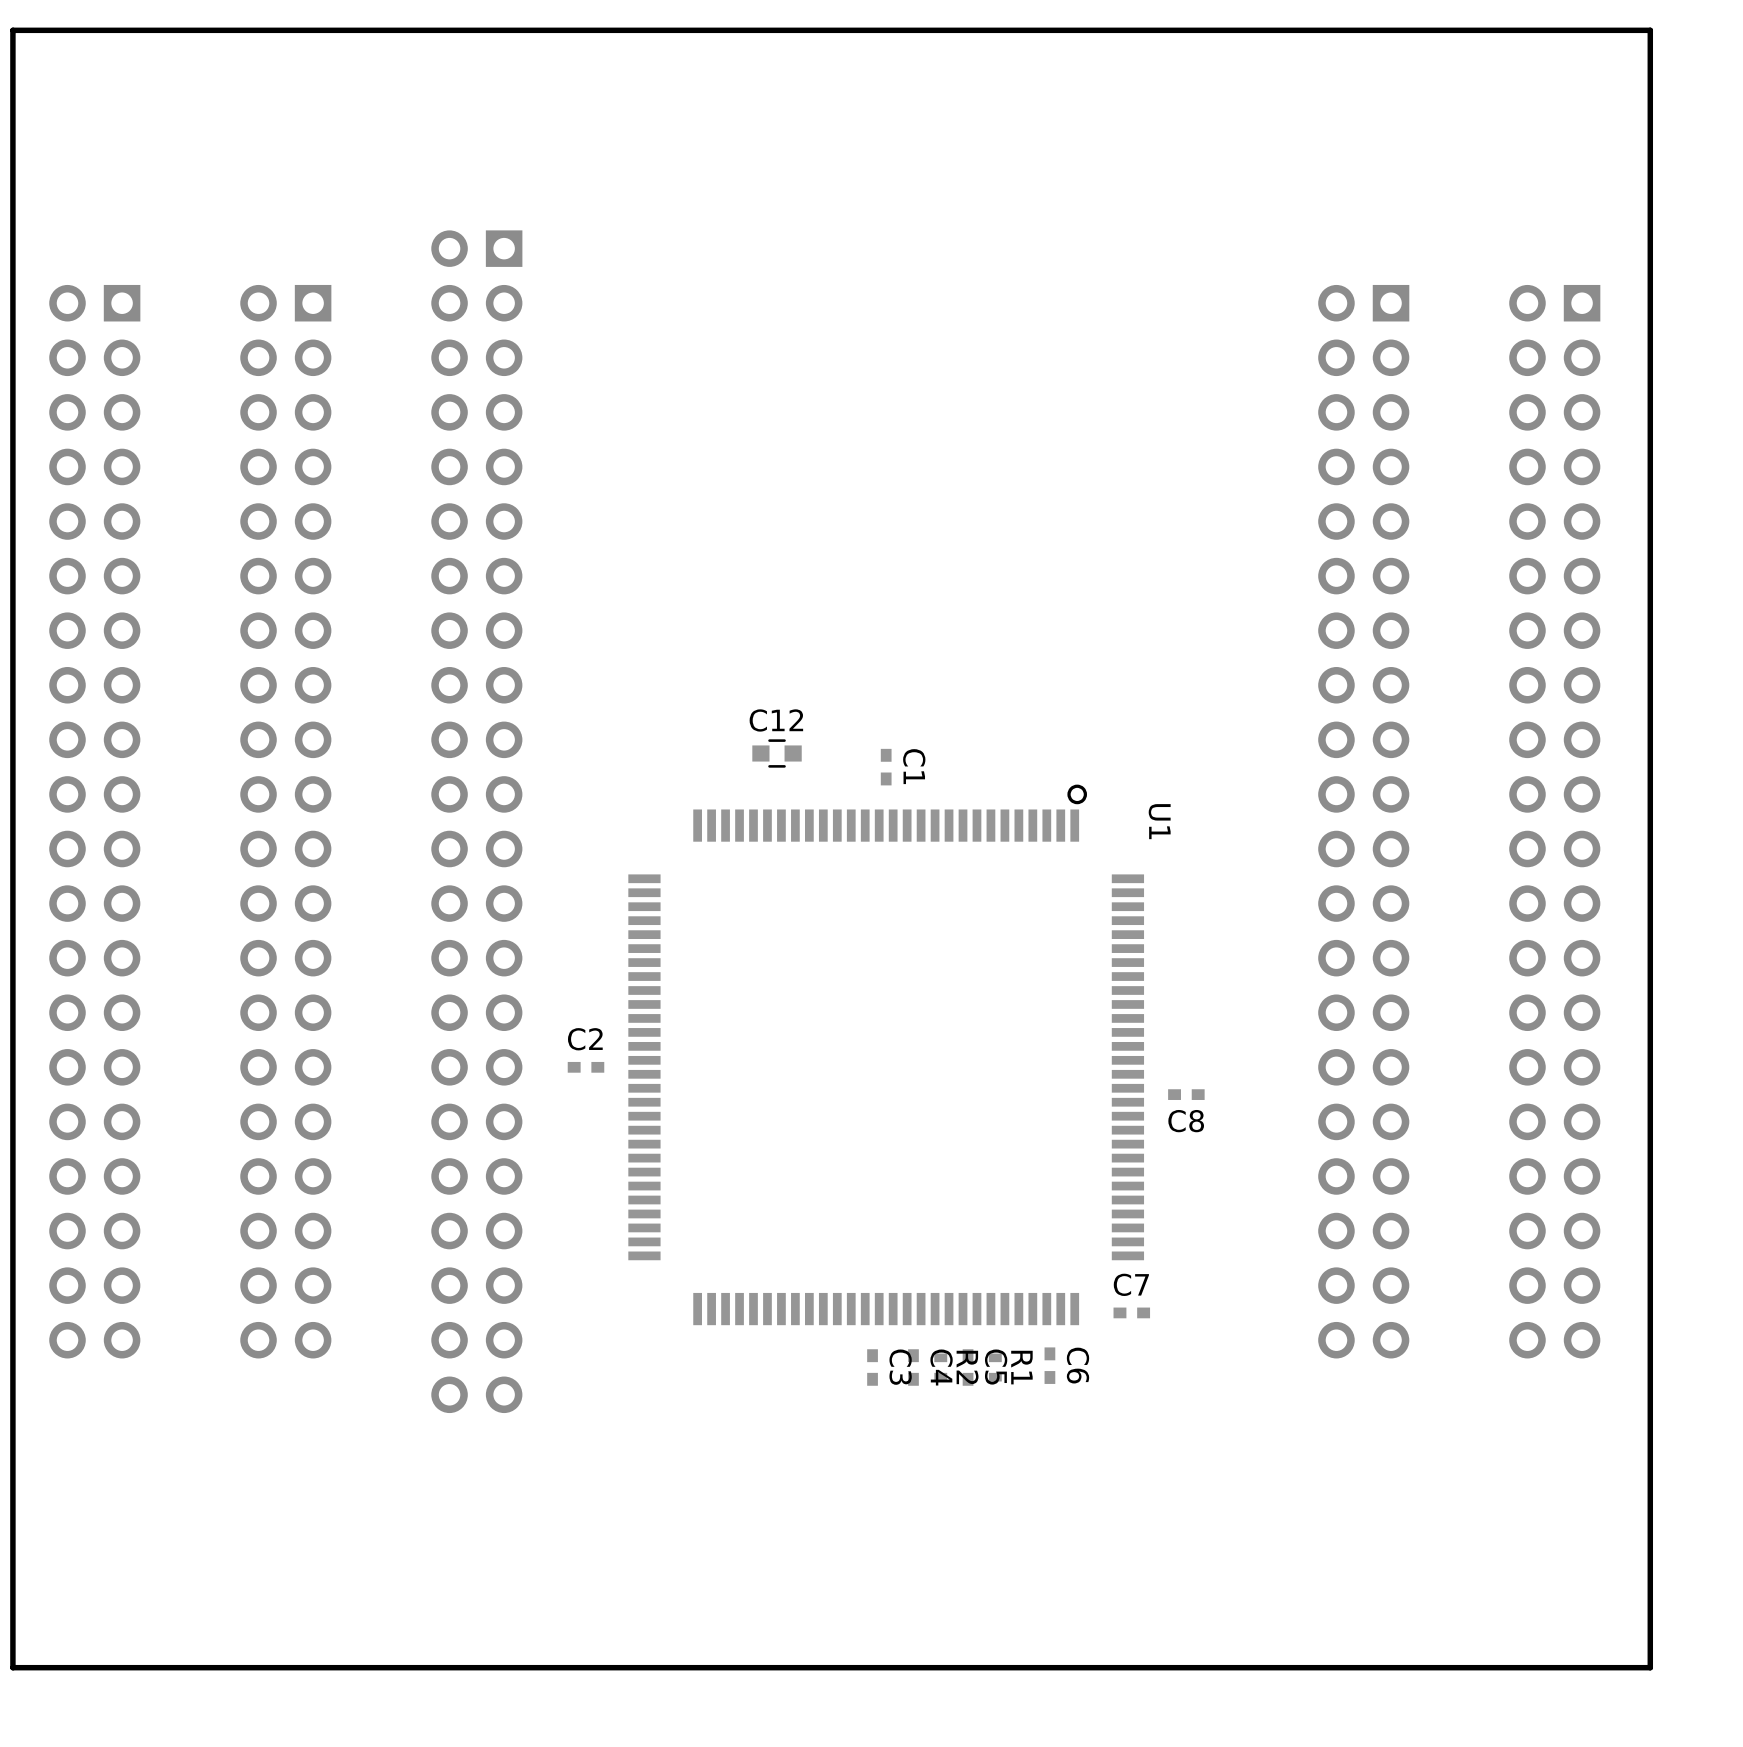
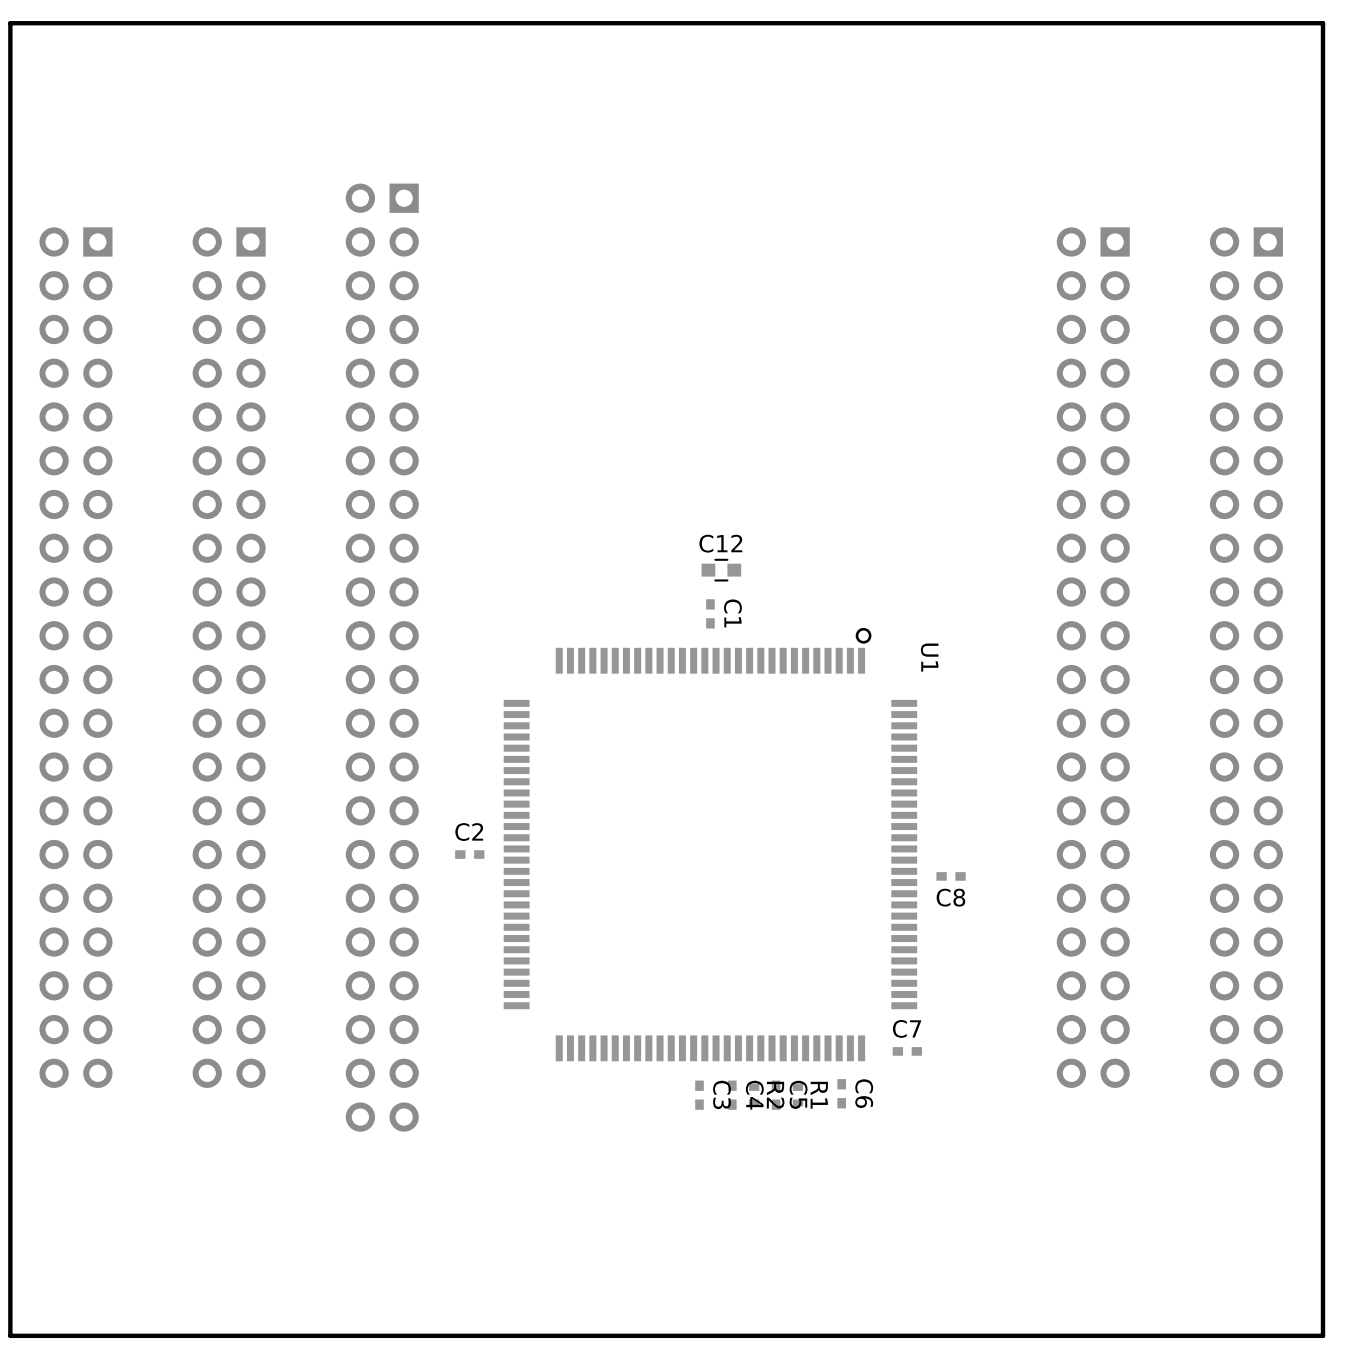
C12 position: (777, 753) -> (721, 570)

